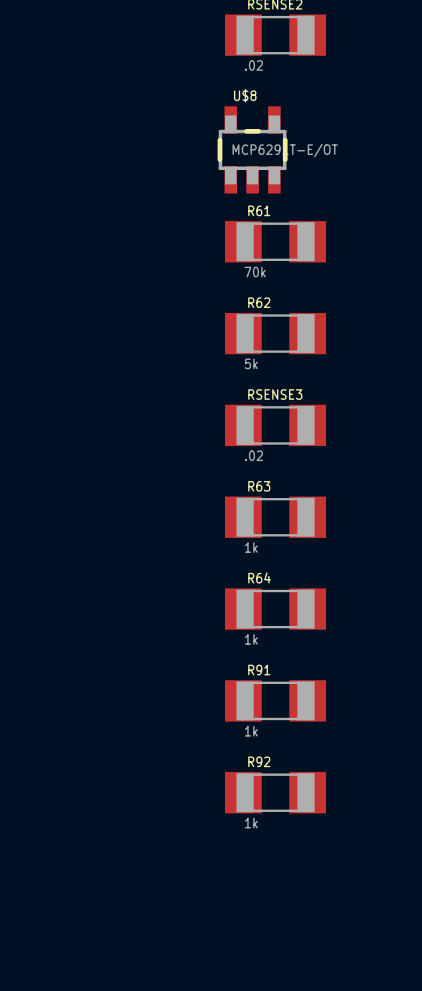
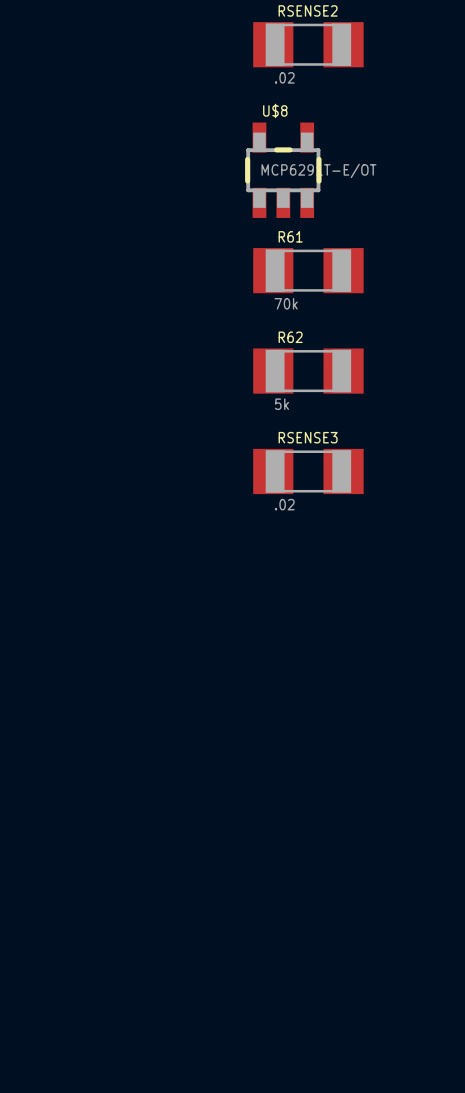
R63: 1k (275, 517) -> none
R64: 1k (275, 609) -> none
R91: 1k (275, 700) -> none
R92: 1k (275, 792) -> none

